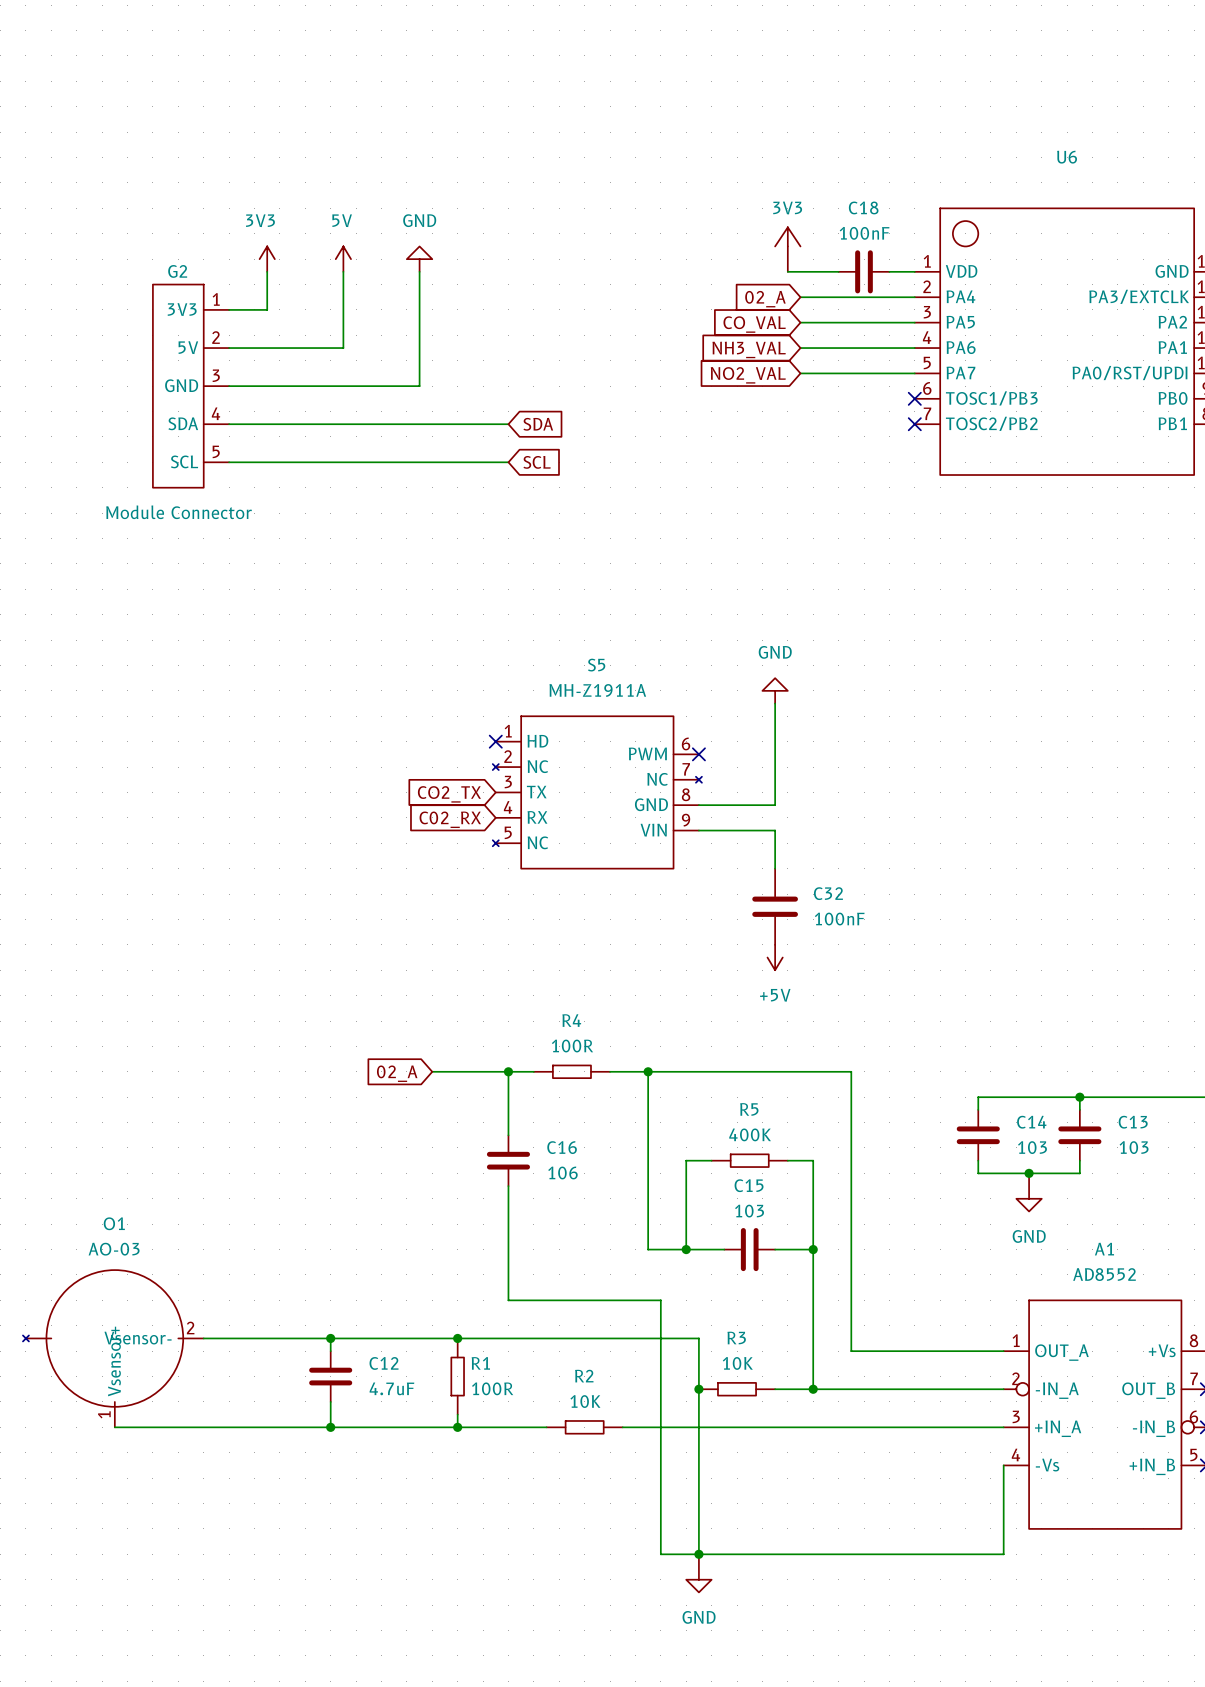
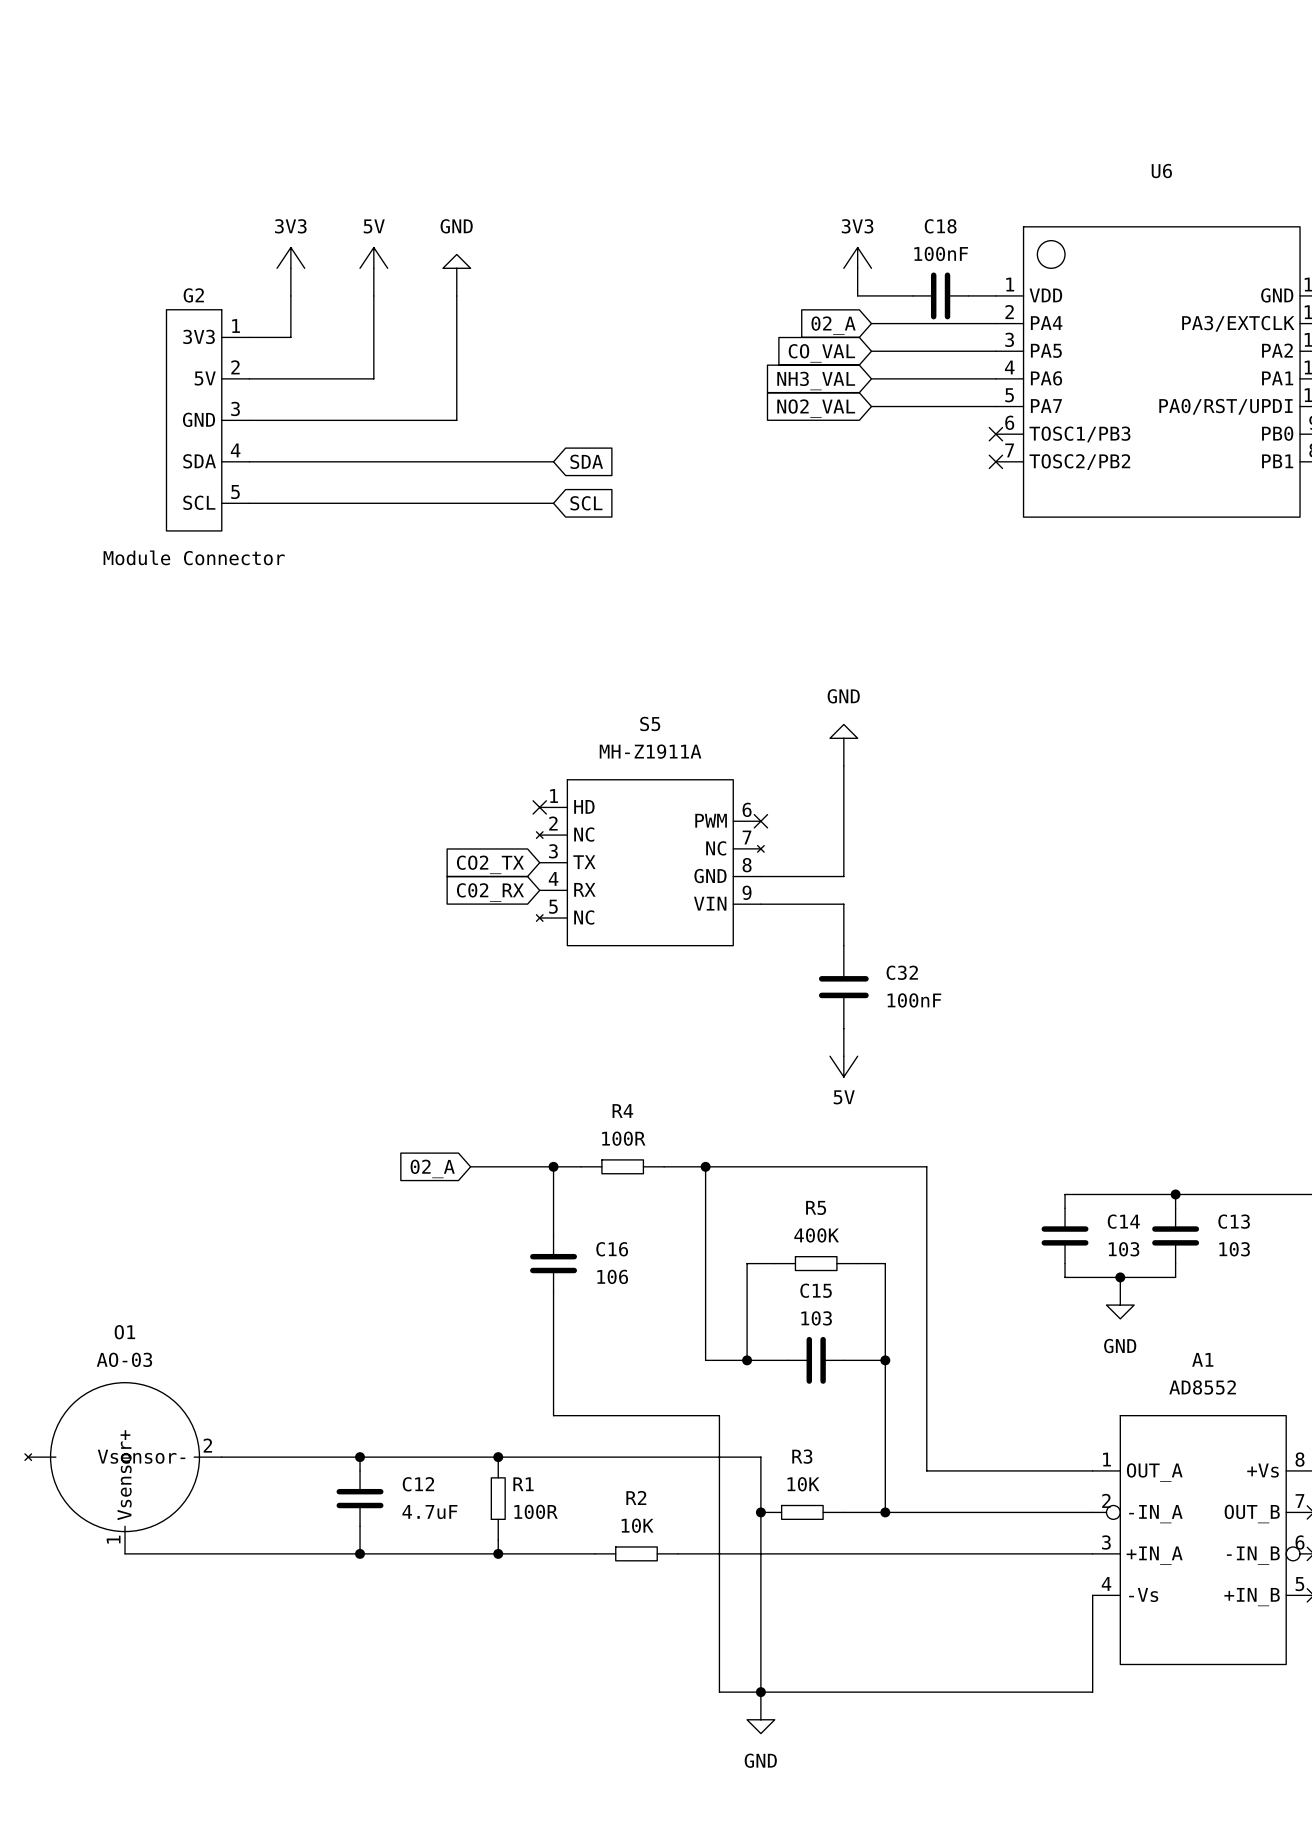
power symbol shape: [259, 246, 275, 272] -> [277, 247, 305, 296]
power symbol shape: [335, 246, 352, 272] -> [360, 247, 388, 296]
power symbol shape: [406, 246, 433, 272] -> [442, 254, 471, 296]
power symbol shape: [762, 678, 788, 704] -> [830, 724, 858, 766]
power symbol: +5V (775, 957) -> 5V (843, 1052)

